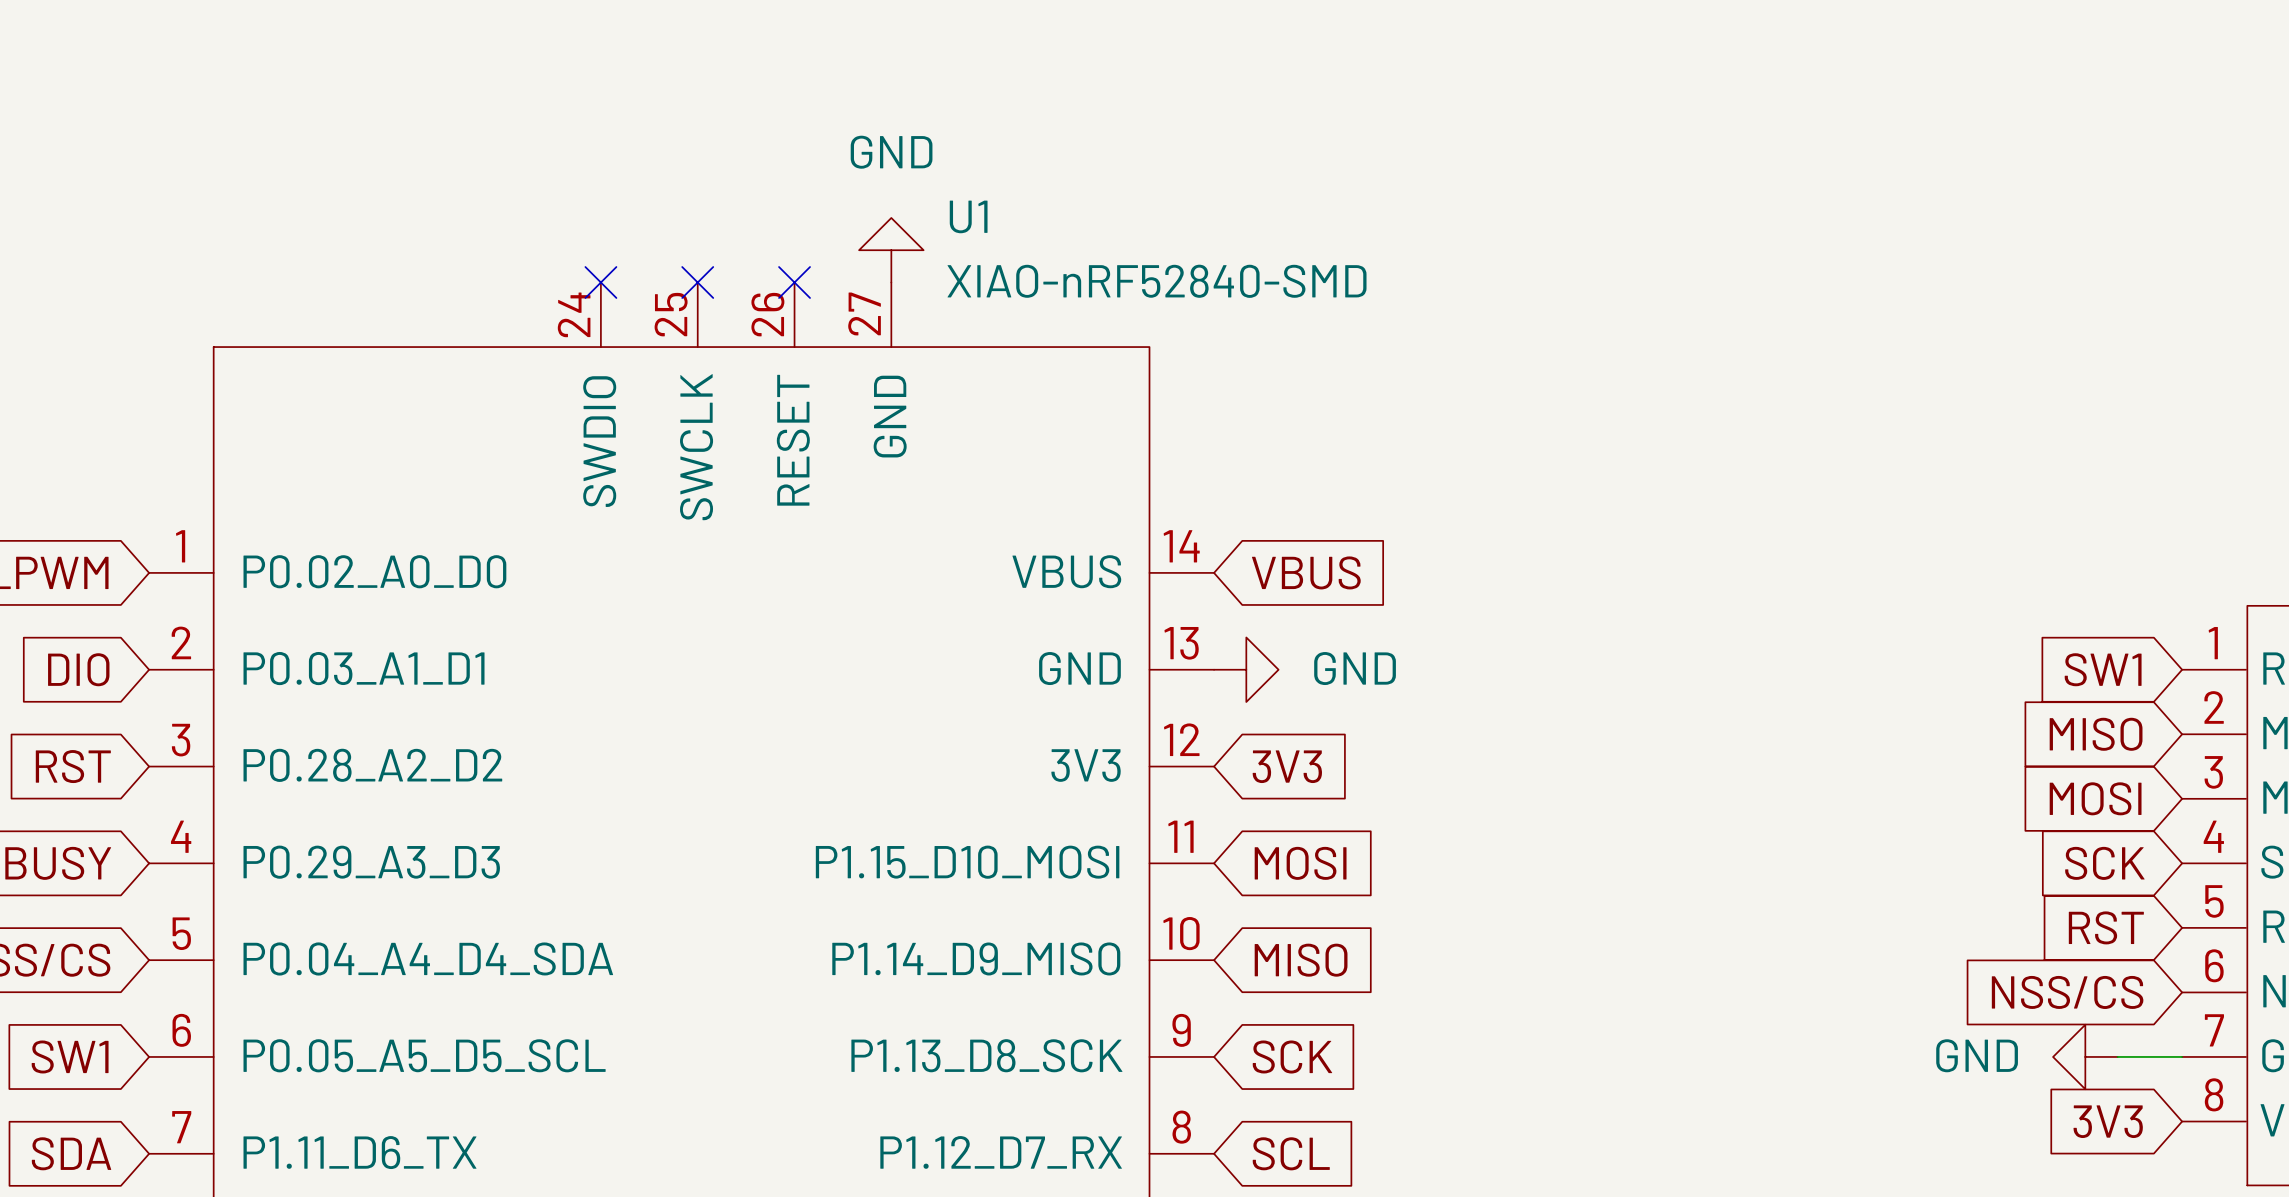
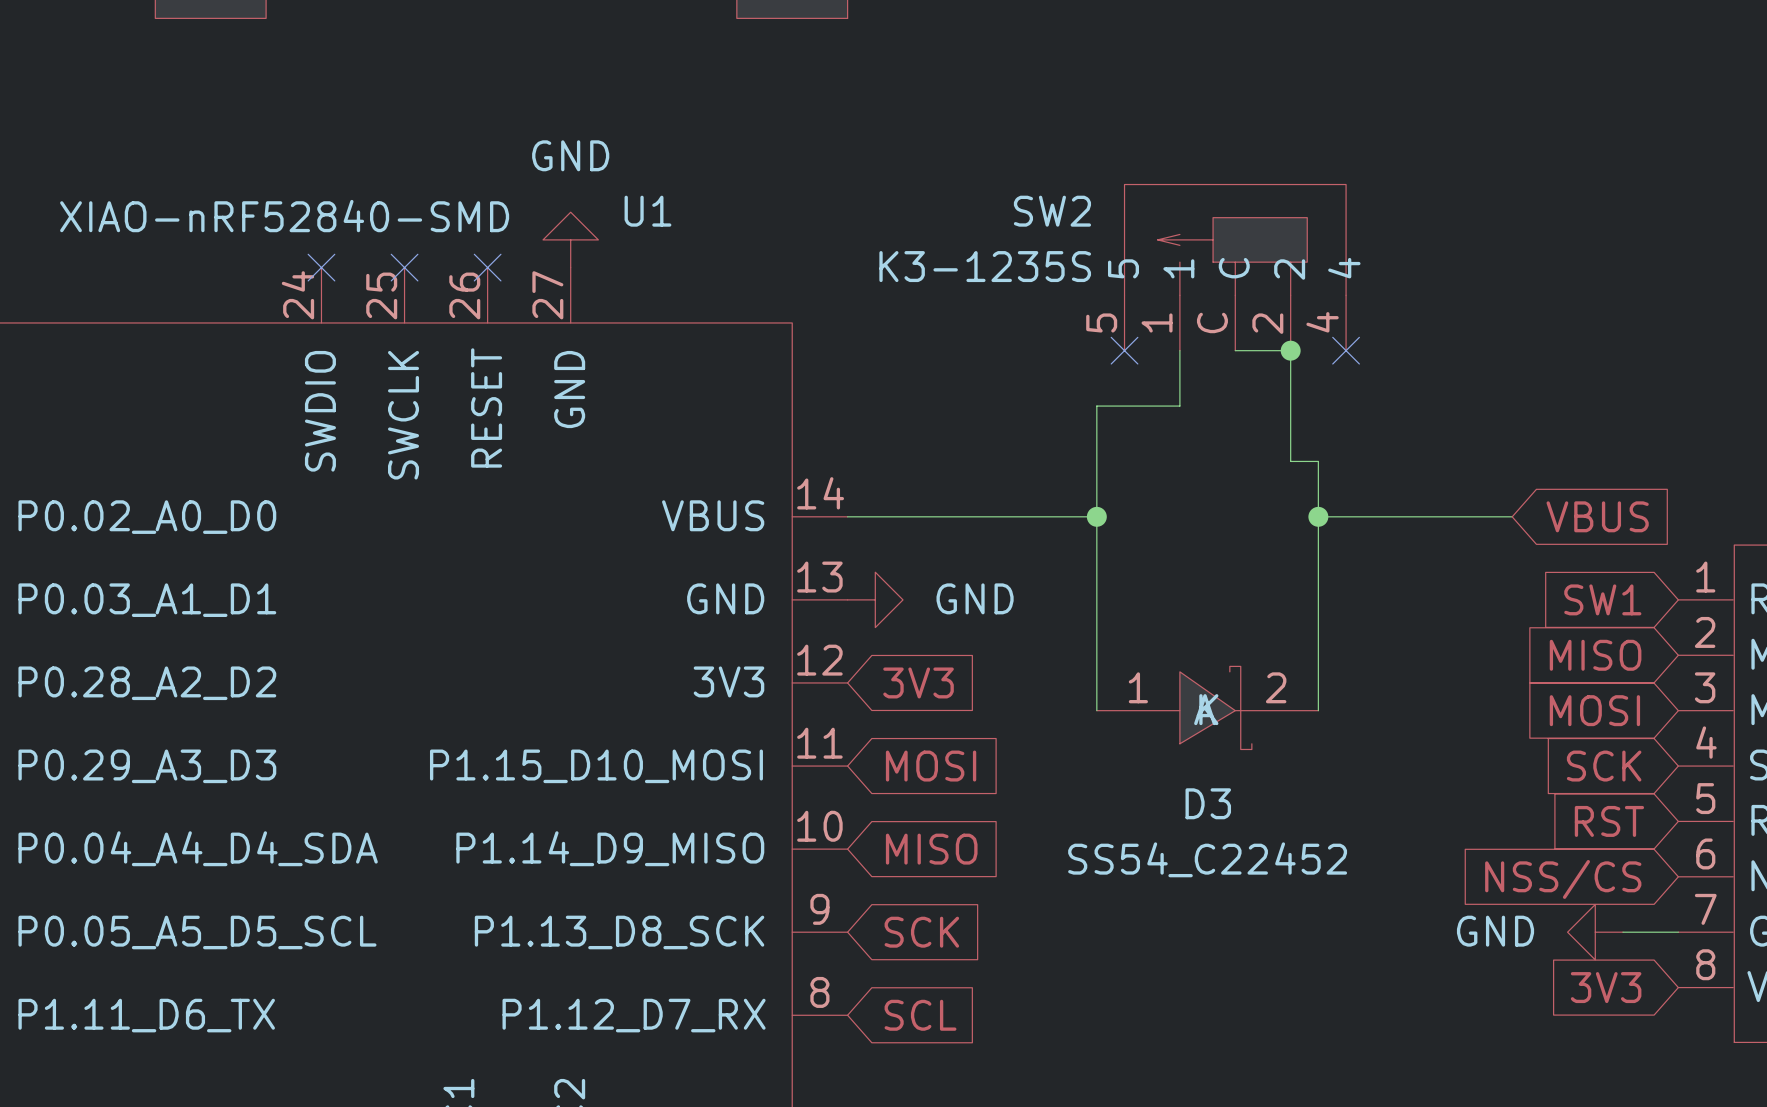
U1 value position: XIAO-nRF52840-SMD (1157, 281) -> XIAO-nRF52840-SMD (284, 216)
SW2: none -> K3-1235S (1235, 267)
no-connect mark: none -> (1124, 350)
wire: none -> (1179, 350) (1179, 406) (1096, 406) (1096, 710)
wire: none -> (1235, 350) (1290, 350) (1290, 461) (1318, 461) (1318, 710)
junction: none -> (1290, 350)
no-connect mark: none -> (1346, 350)
wire: none -> (847, 516) (1096, 516)
global label: VBUS (1306, 572) -> none
junction: none -> (1096, 516)
wire: none -> (1318, 516) (1512, 516)
junction: none -> (1318, 516)
global label: none -> VBUS (1597, 516)
D3: none -> SS54_C22452 (1207, 707)

